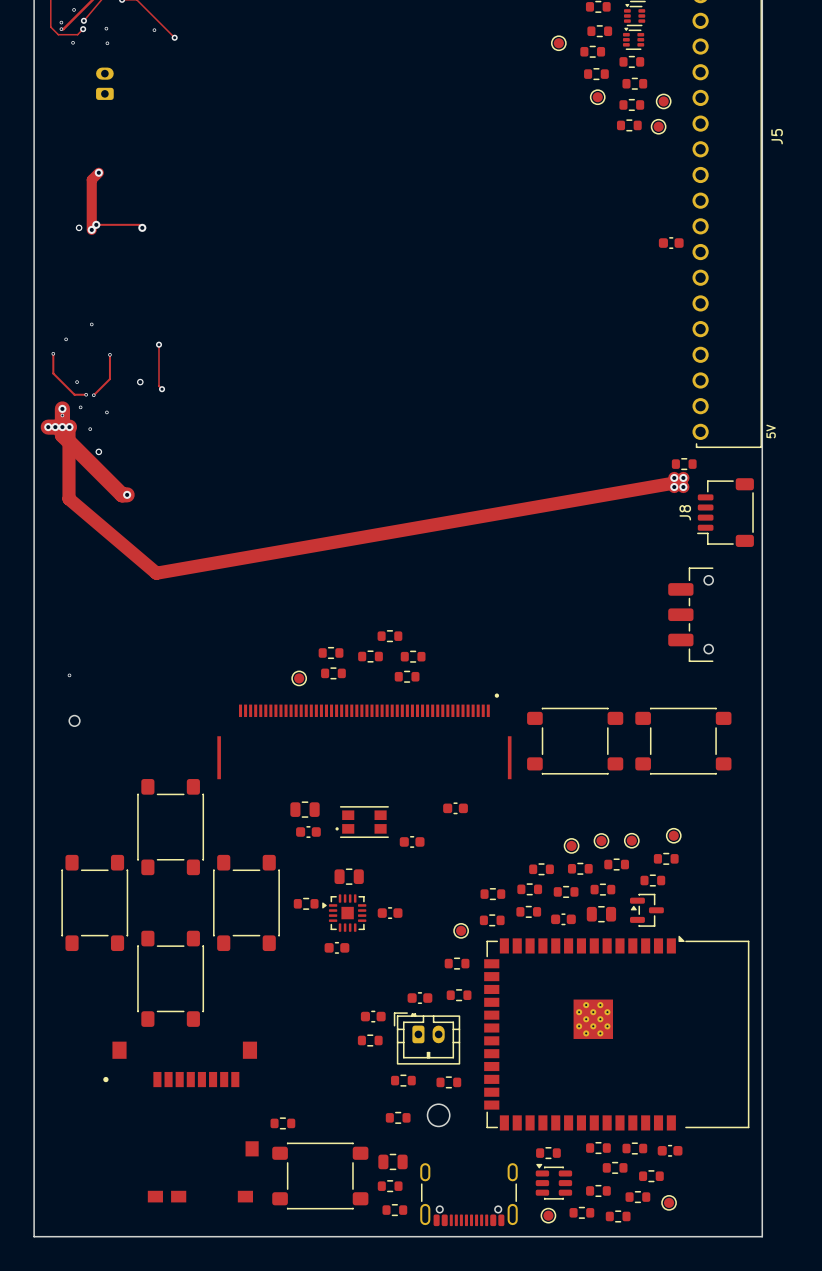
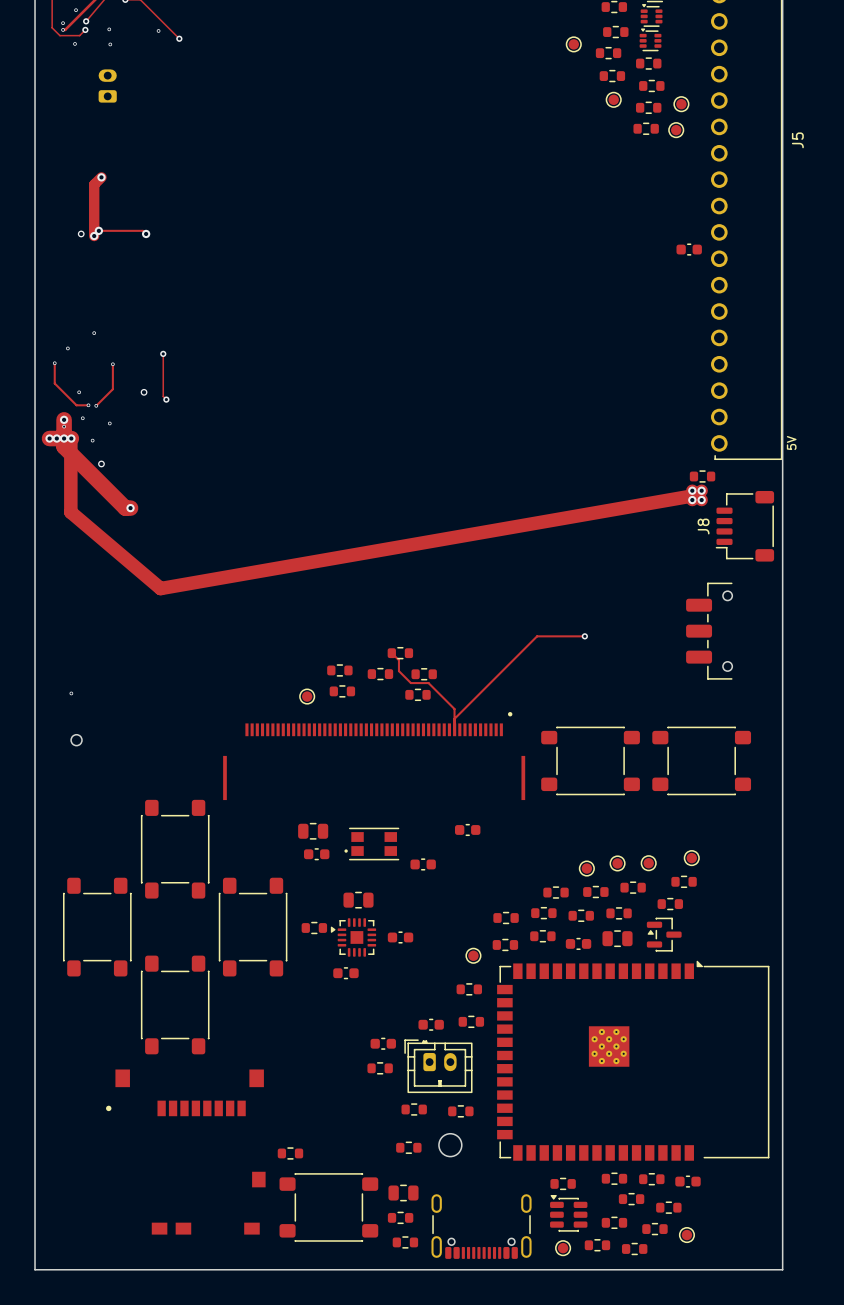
track: none -> (584, 636) (537, 636) (454, 718)
via: none -> (584, 636)
track: none -> (391, 653) (398, 660) (398, 671) (410, 683) (428, 683) (454, 709) (454, 718)
track: none -> (454, 718) (454, 729)

